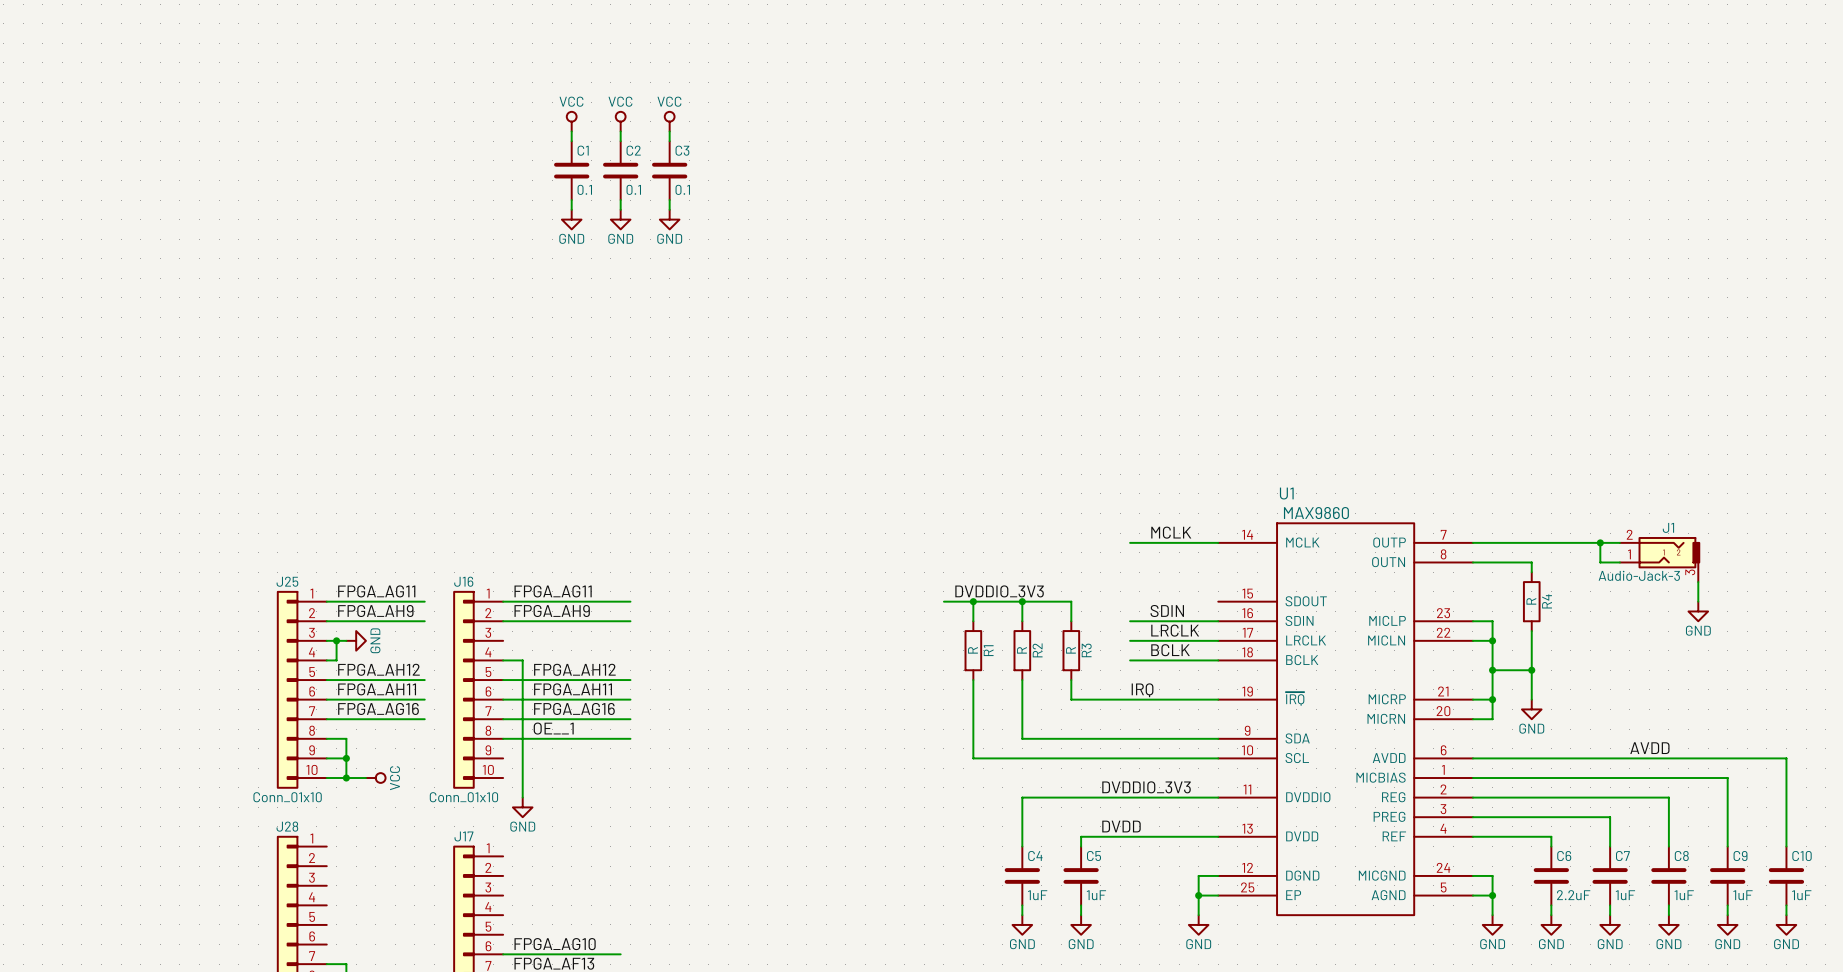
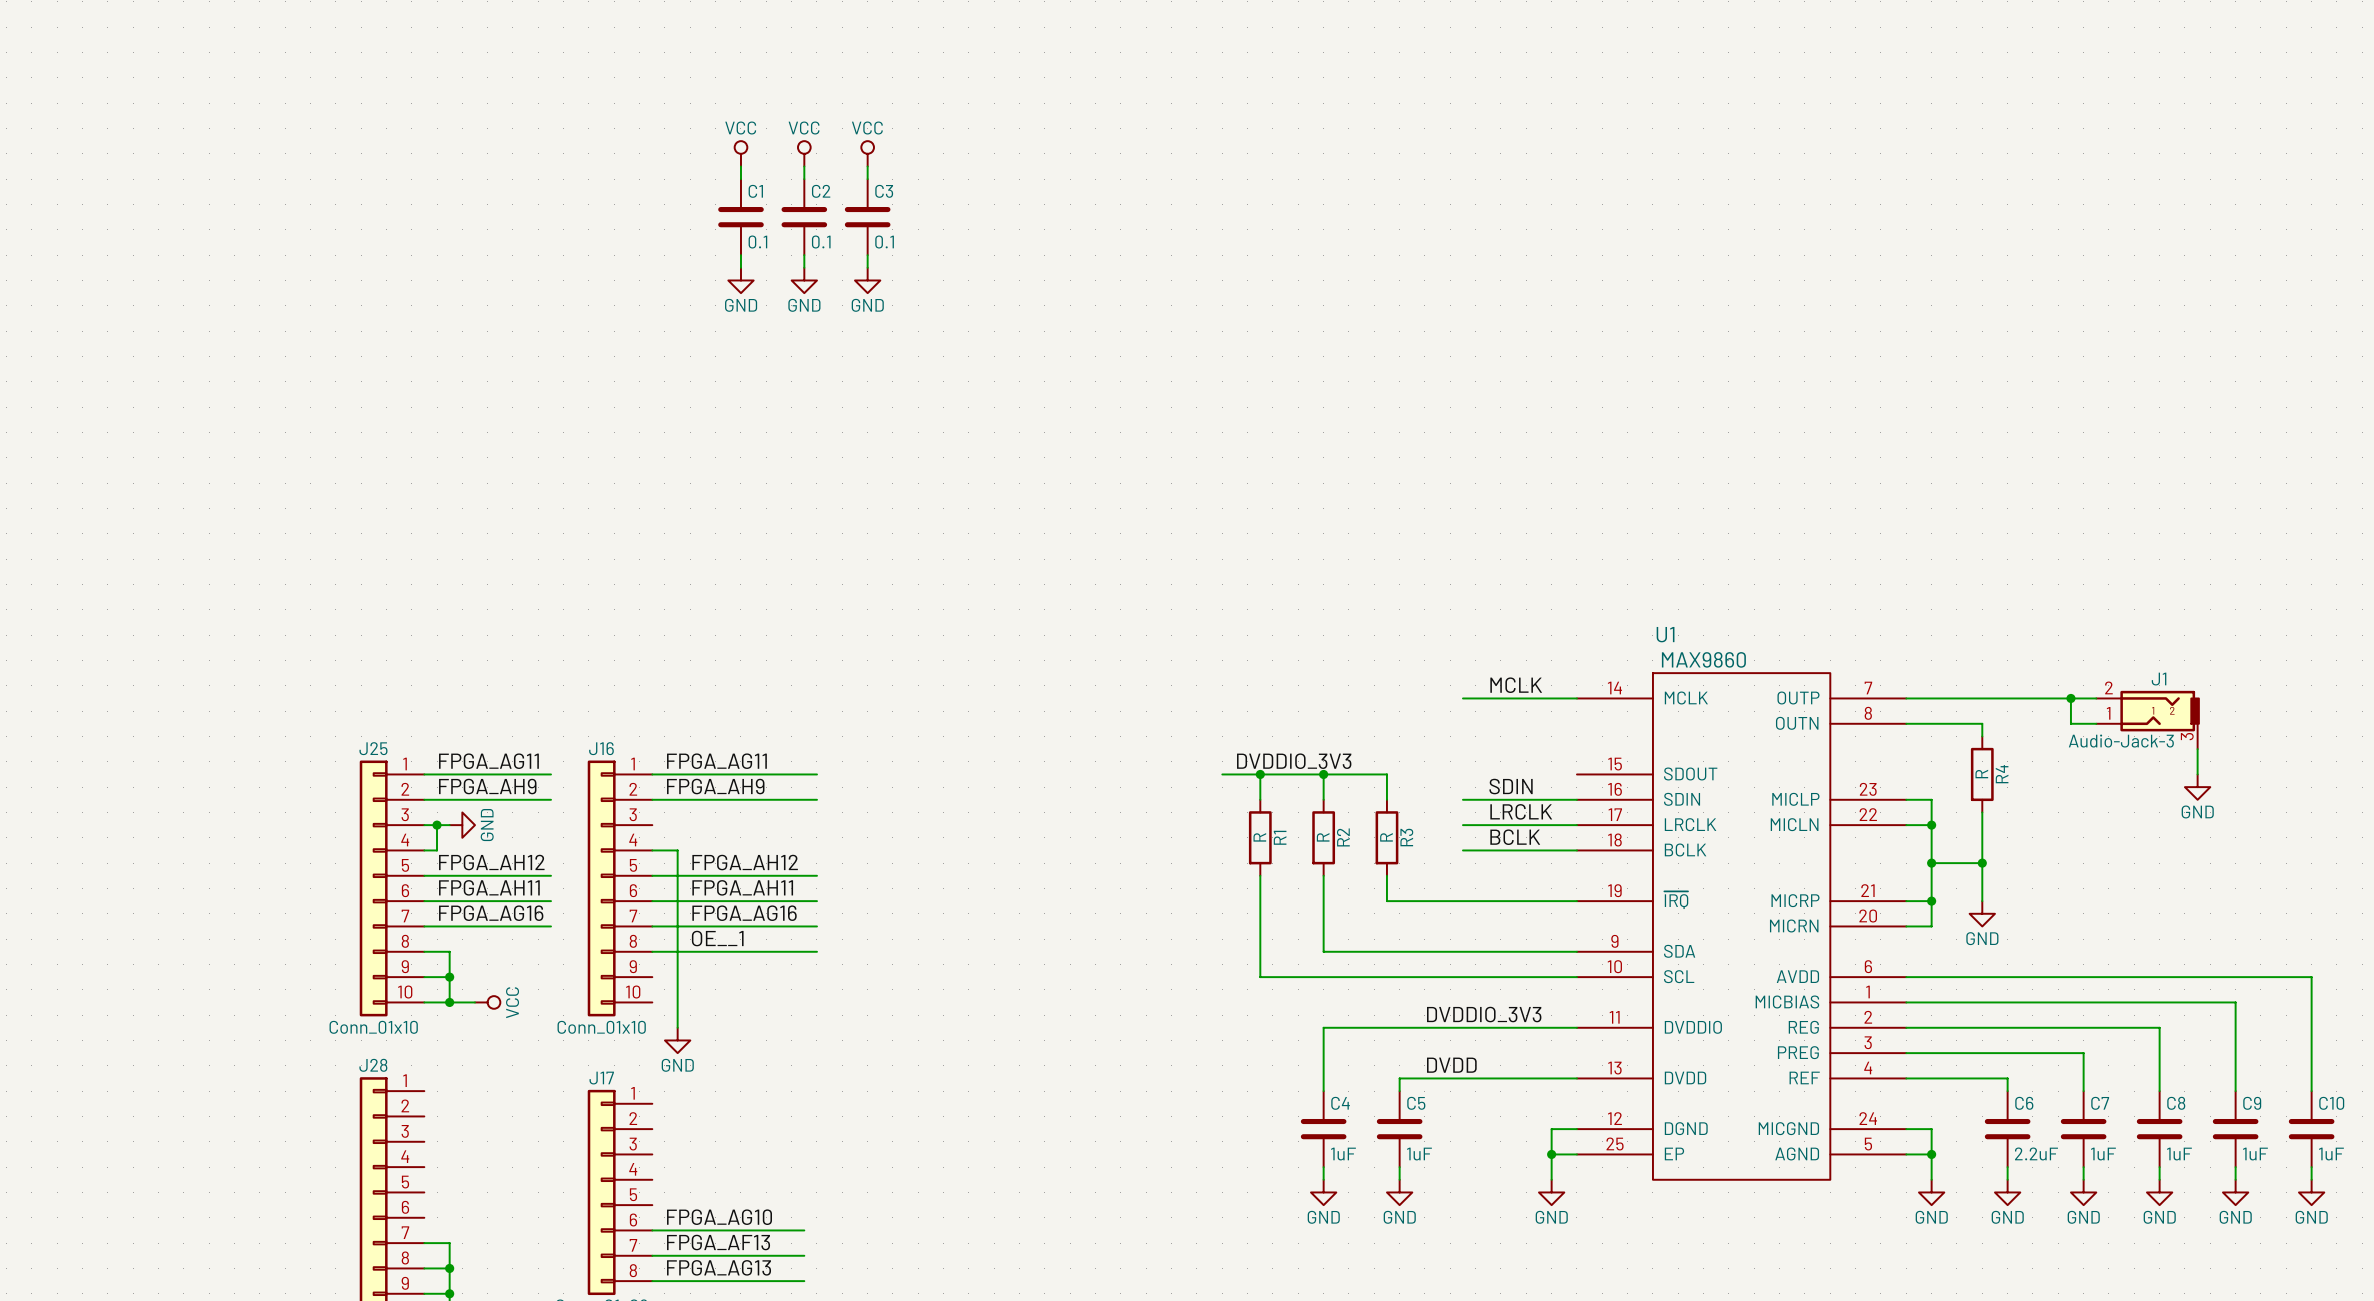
label: IRQ (1142, 690) -> none
label: AVDD (1649, 748) -> none

